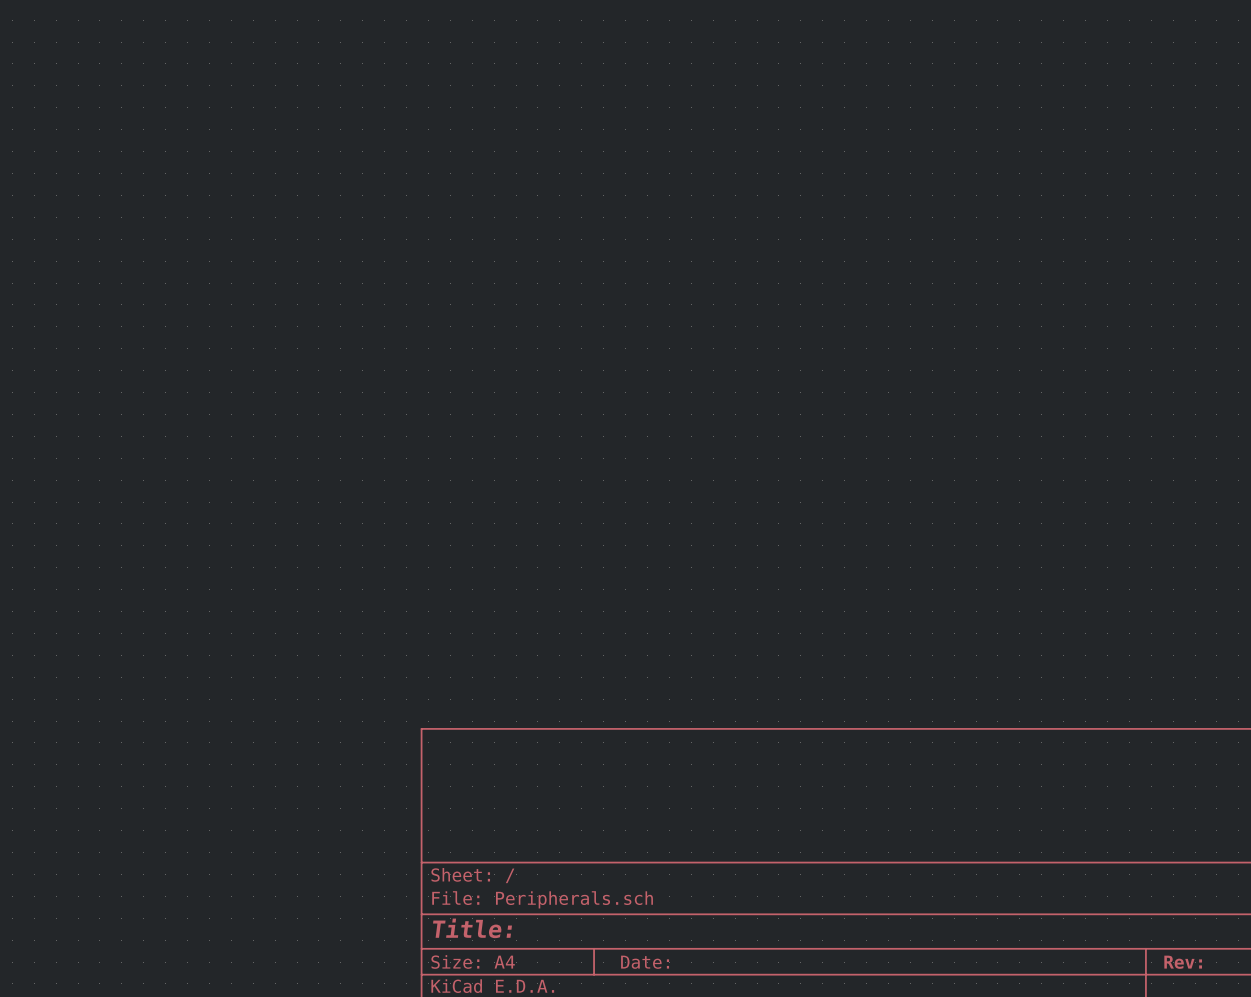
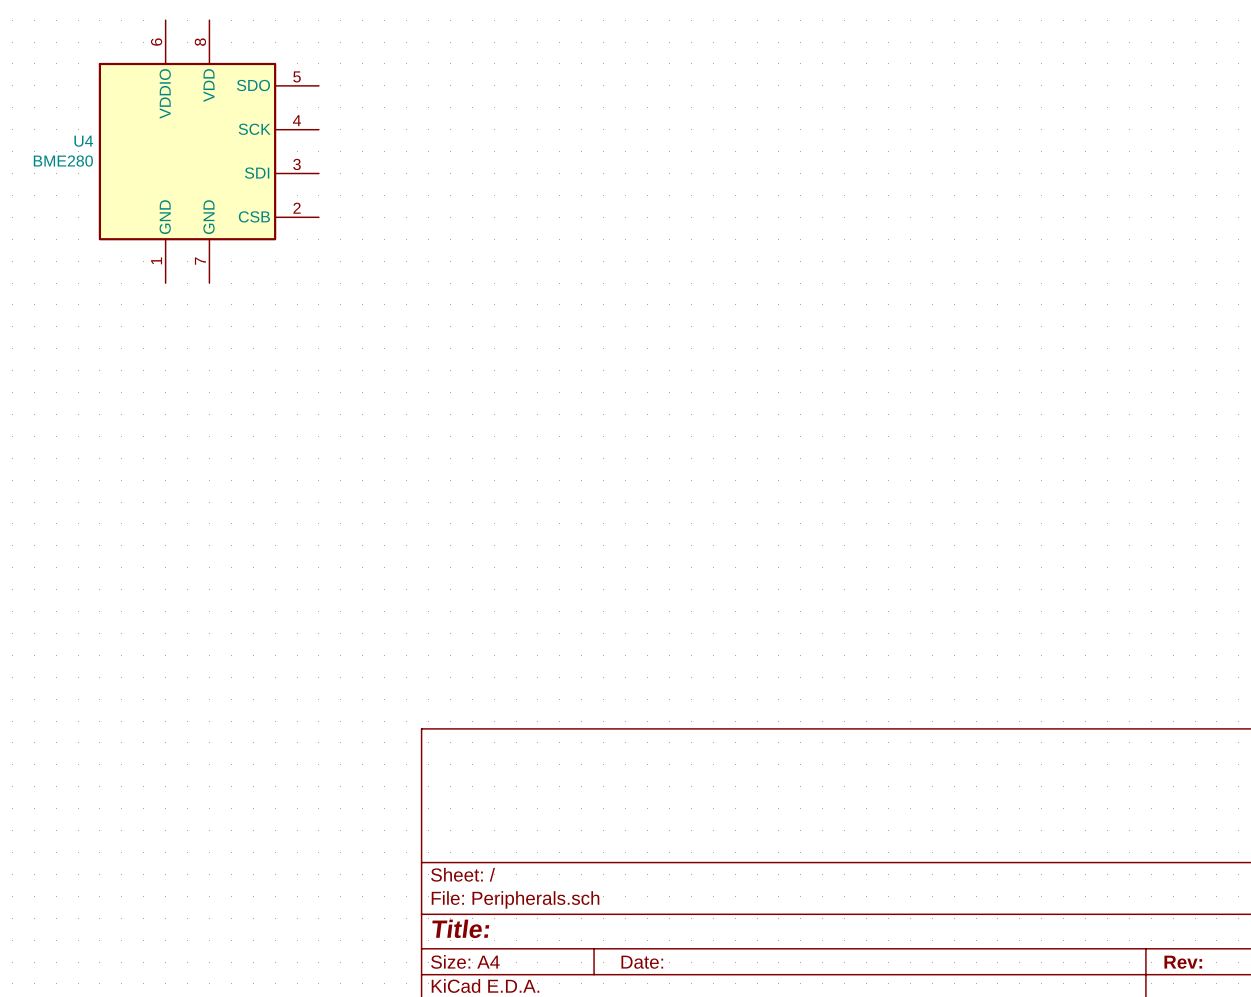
U4: none -> BME280 (208, 151)

